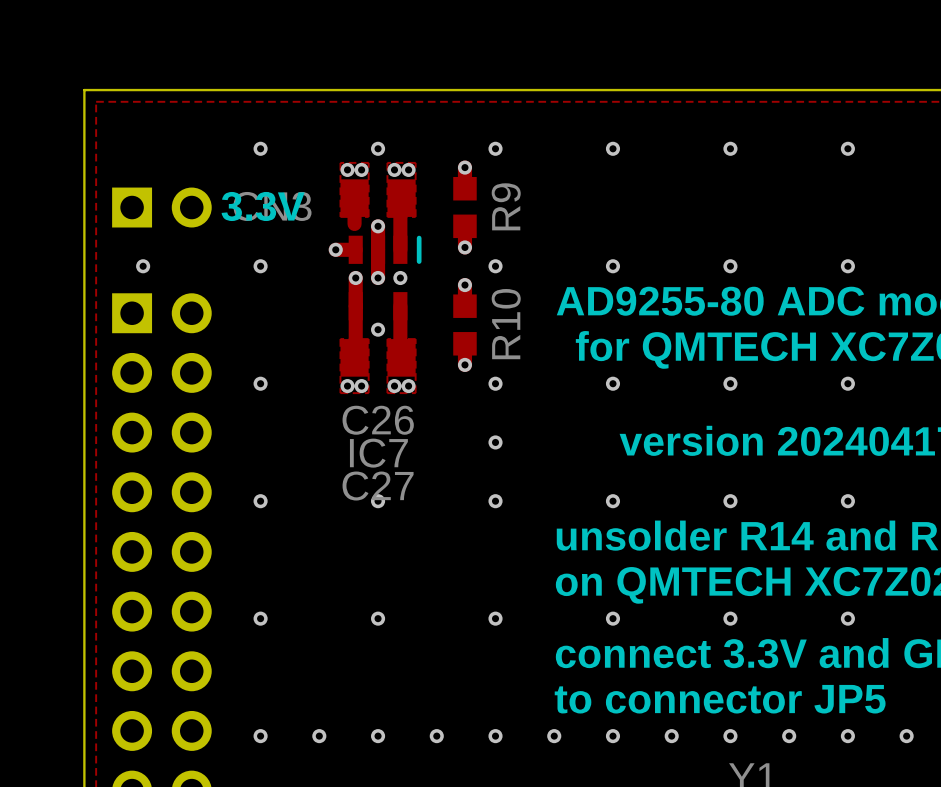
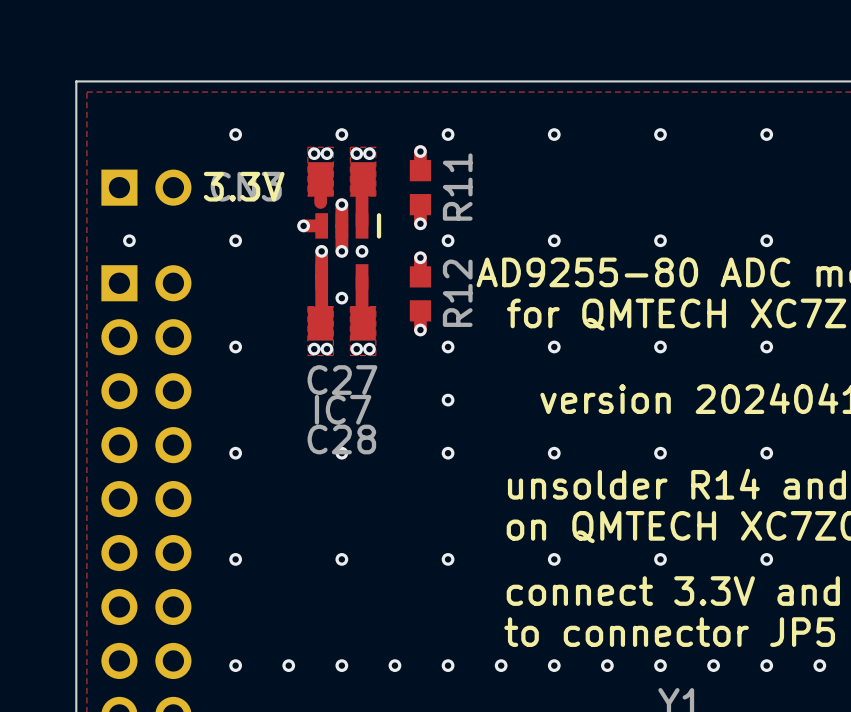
R9 name: R9 (506, 206) -> R11 (457, 187)
R10 name: R10 (506, 324) -> R12 (457, 293)
C26 name: C26 (378, 420) -> C27 (342, 380)
C27 name: C27 (378, 486) -> C28 (341, 439)

